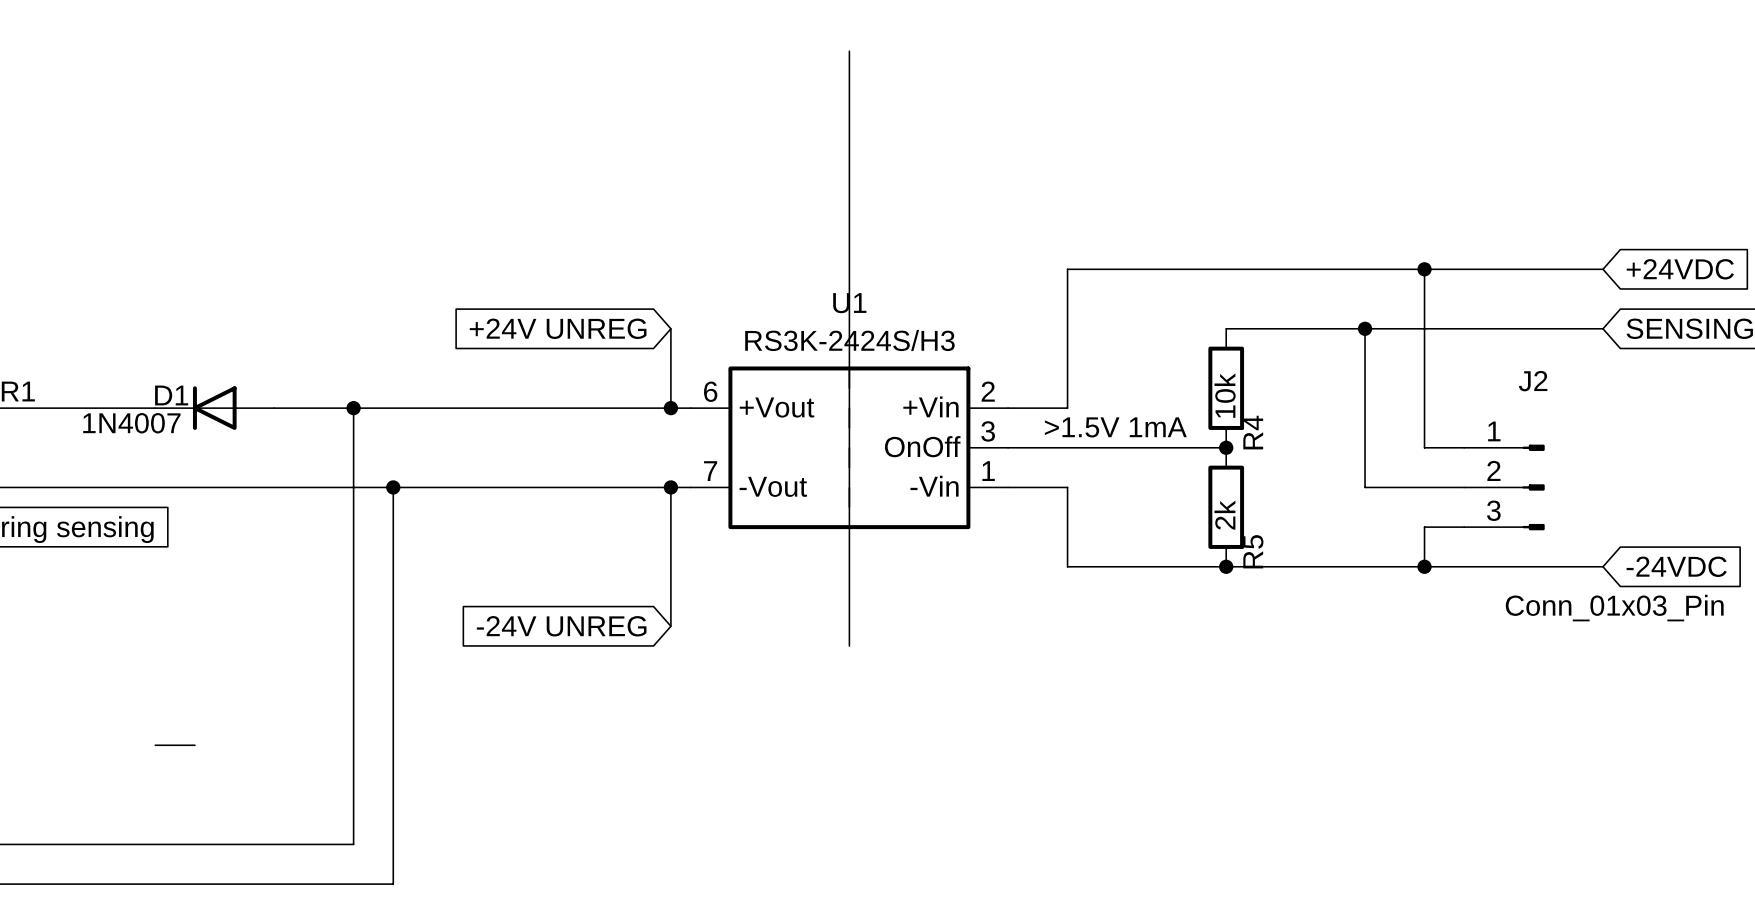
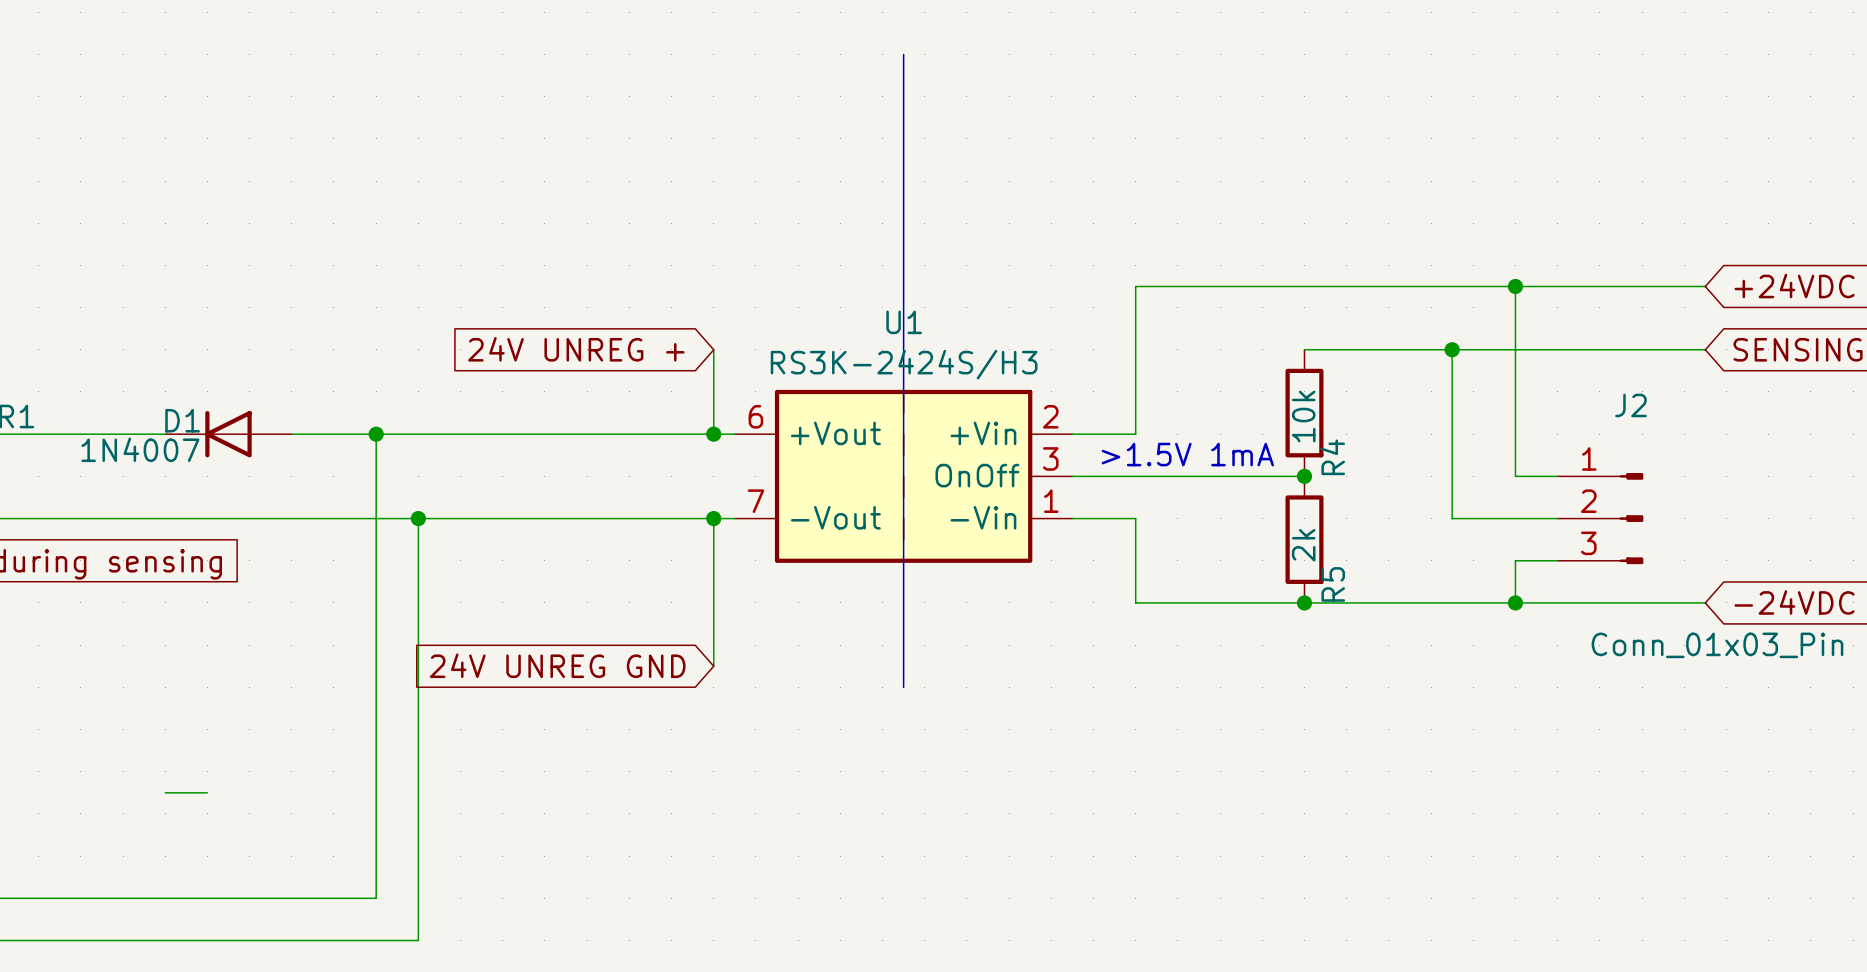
global label: +24V UNREG (558, 328) -> 24V UNREG + (576, 349)
global label: -24V UNREG (561, 626) -> 24V UNREG GND (557, 665)

